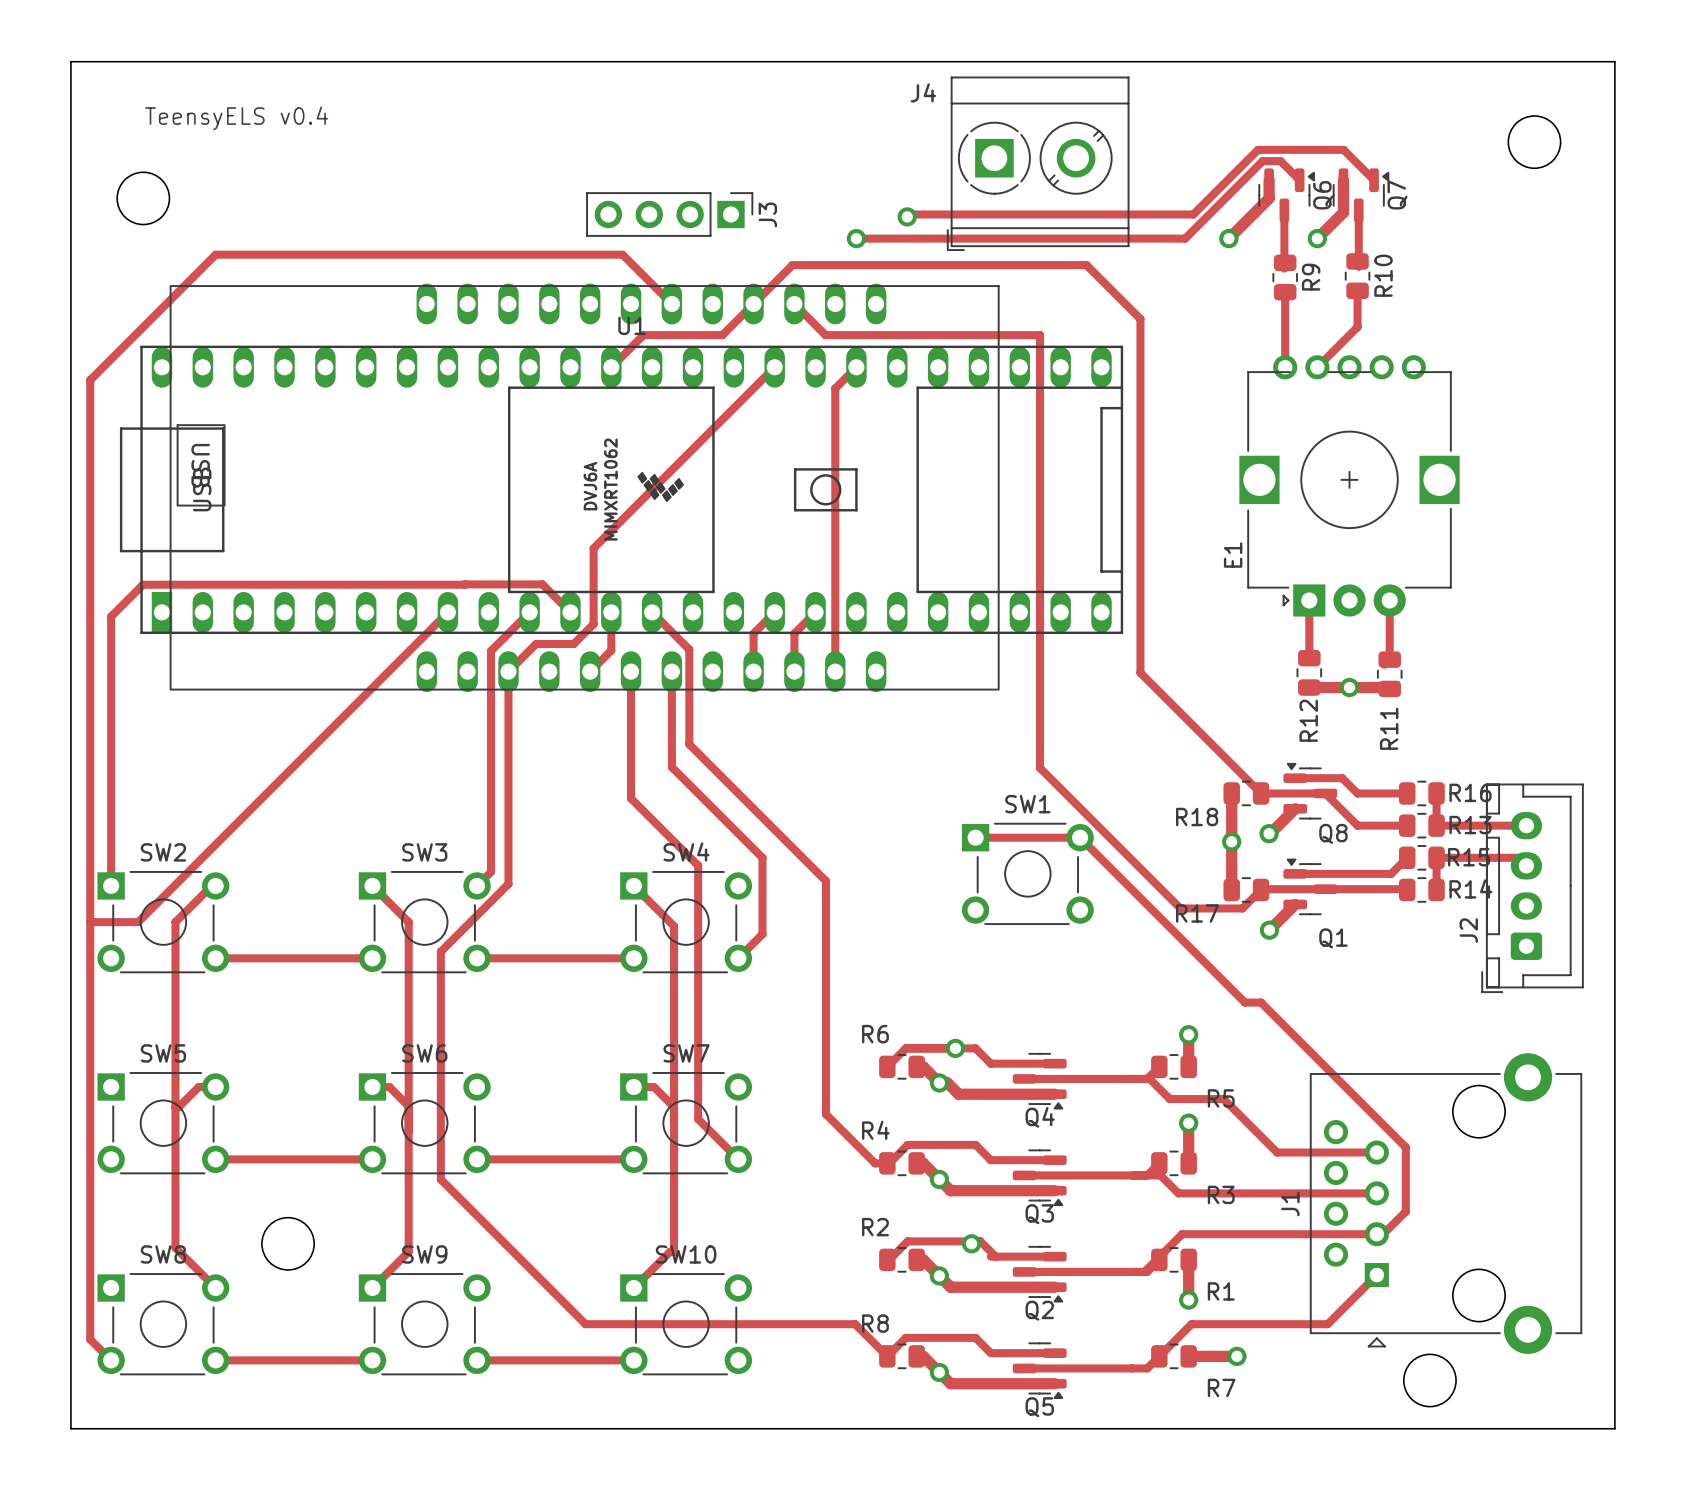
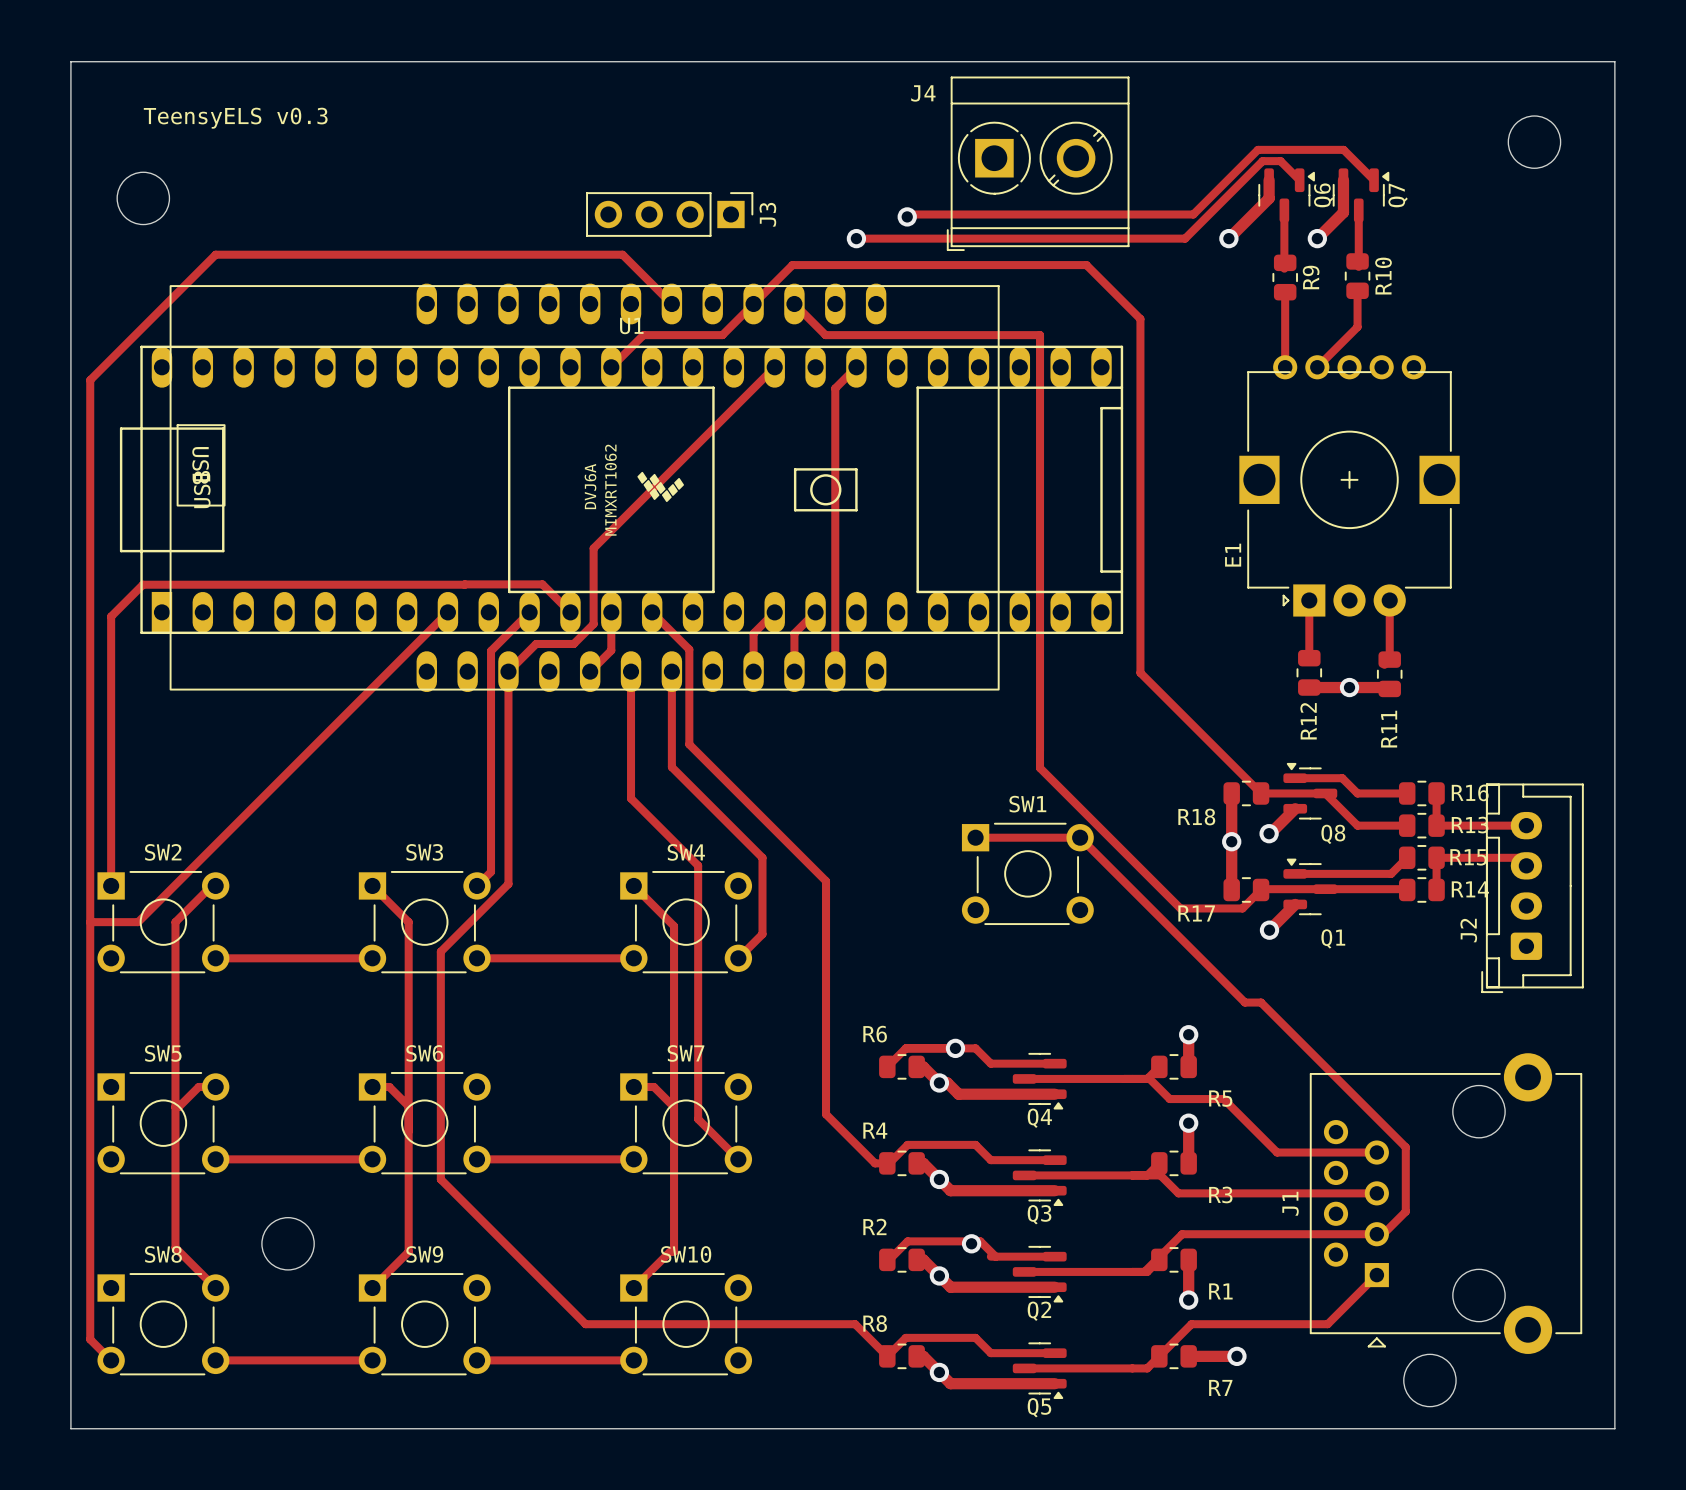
text: TeensyELS v0.4 (236, 118) -> TeensyELS v0.3 (235, 118)

